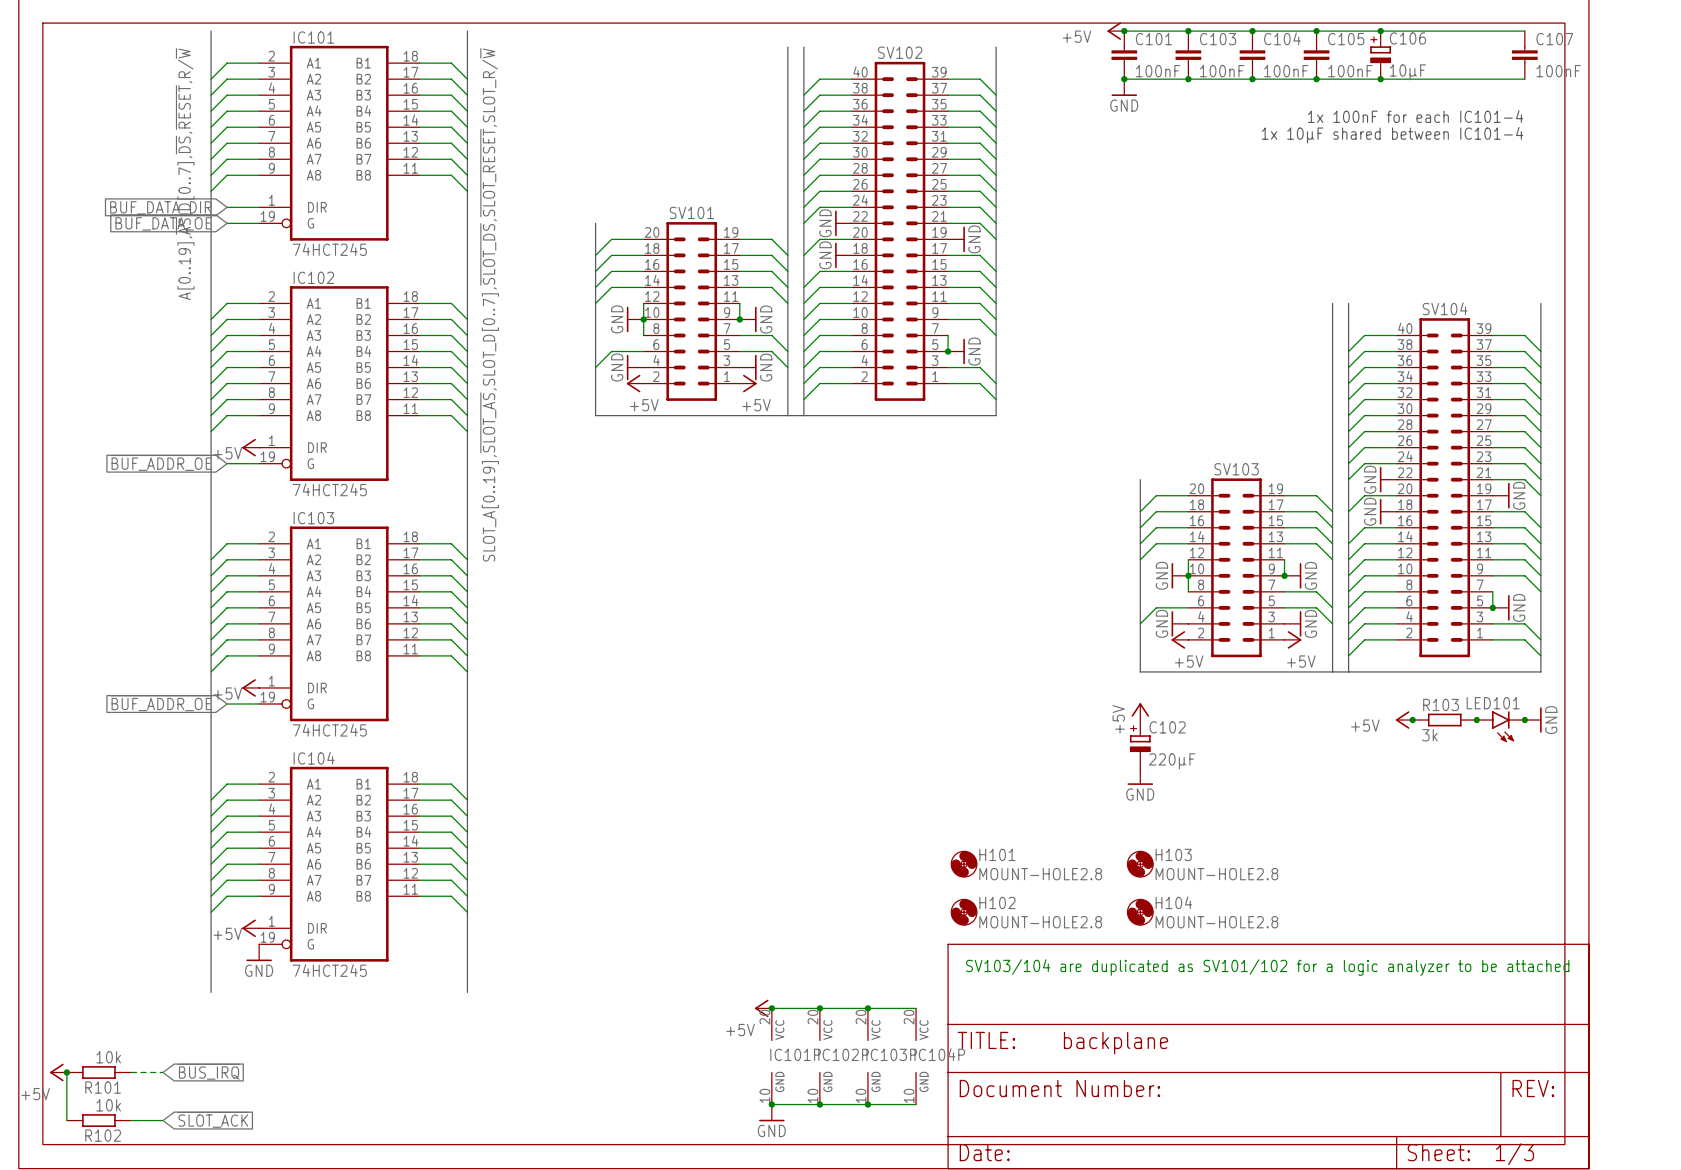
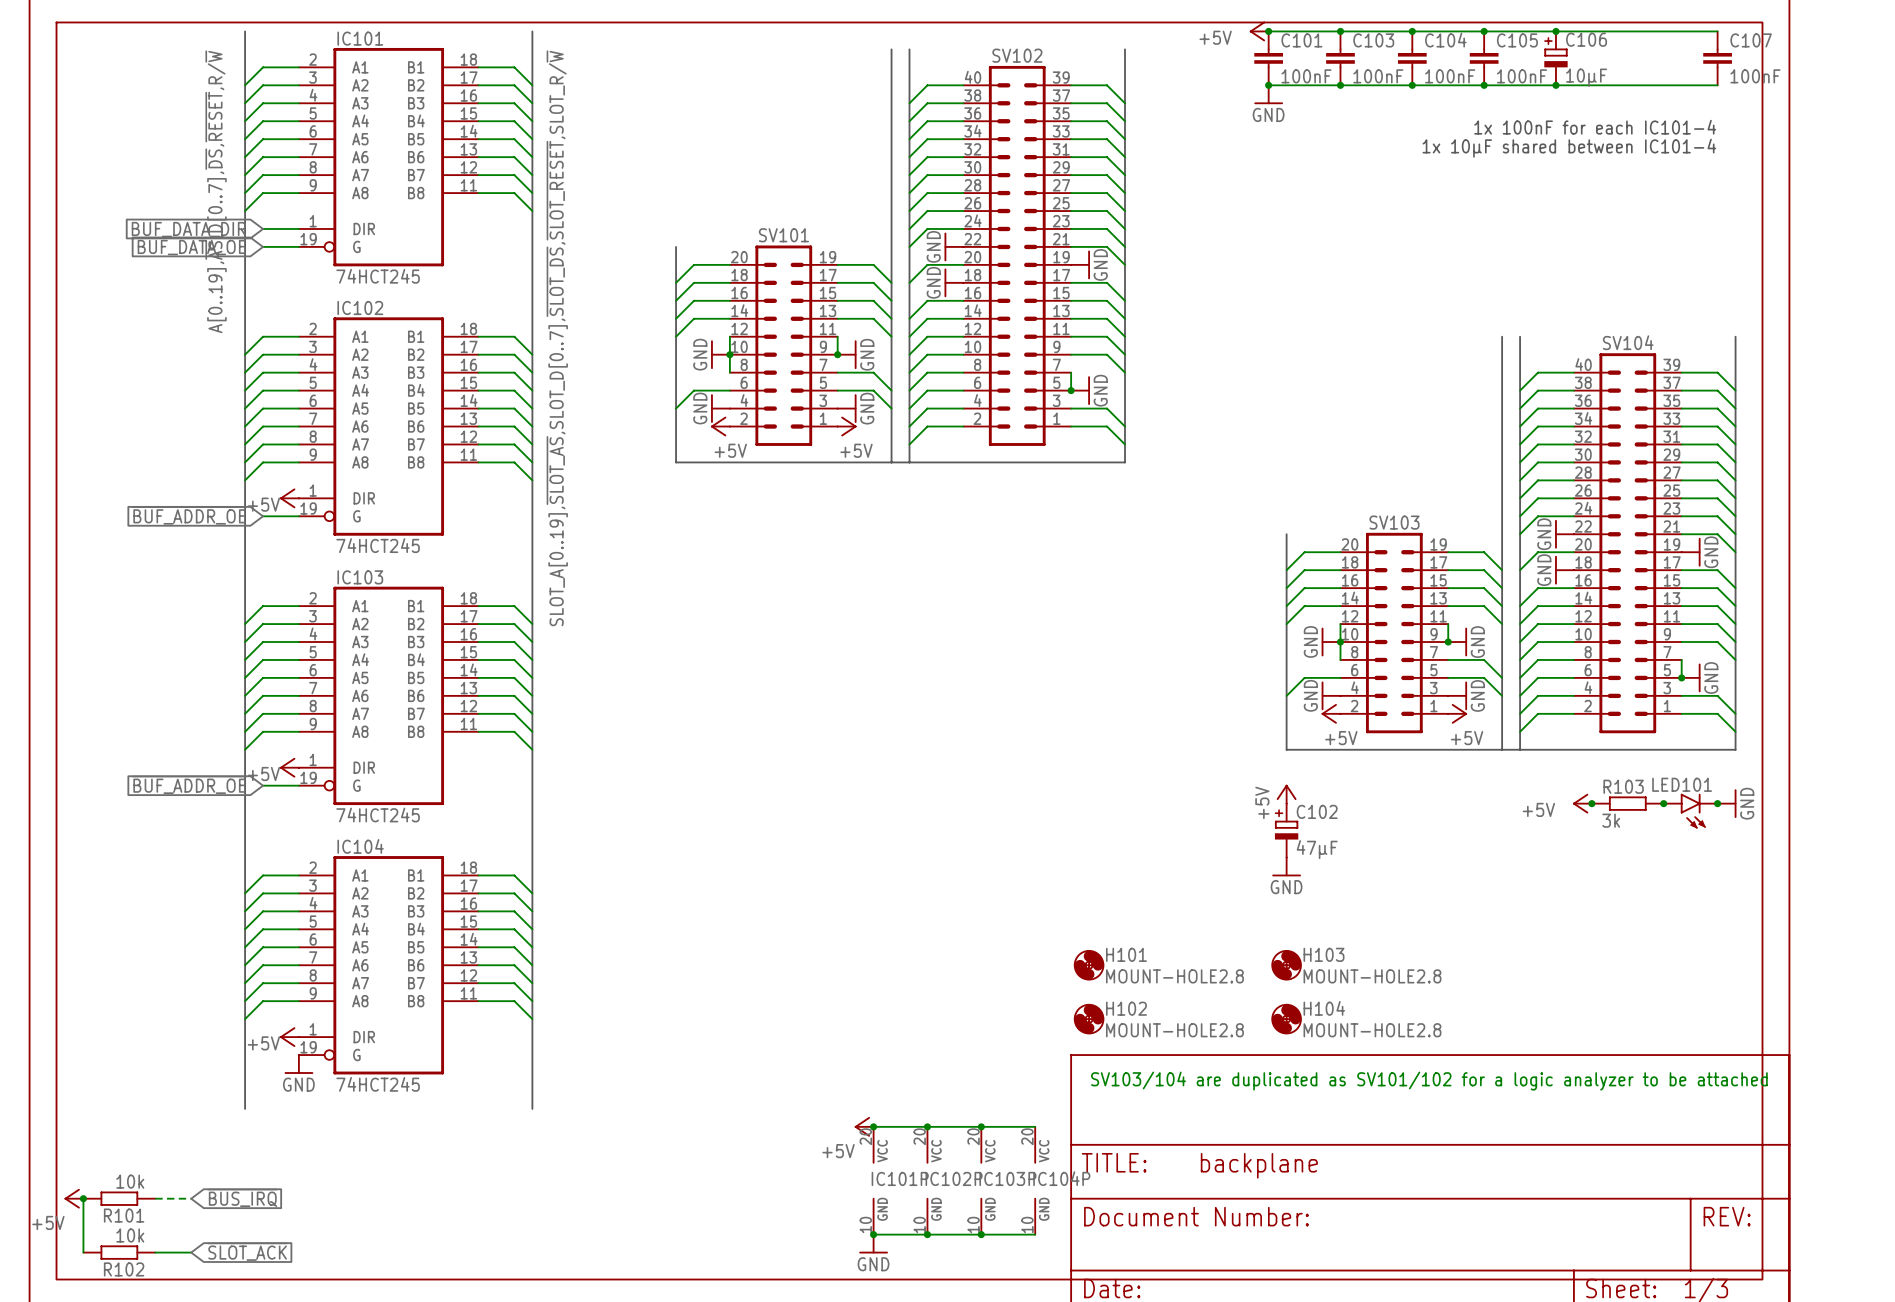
C102 value: 220µF (1172, 761) -> 47µF (1317, 849)

